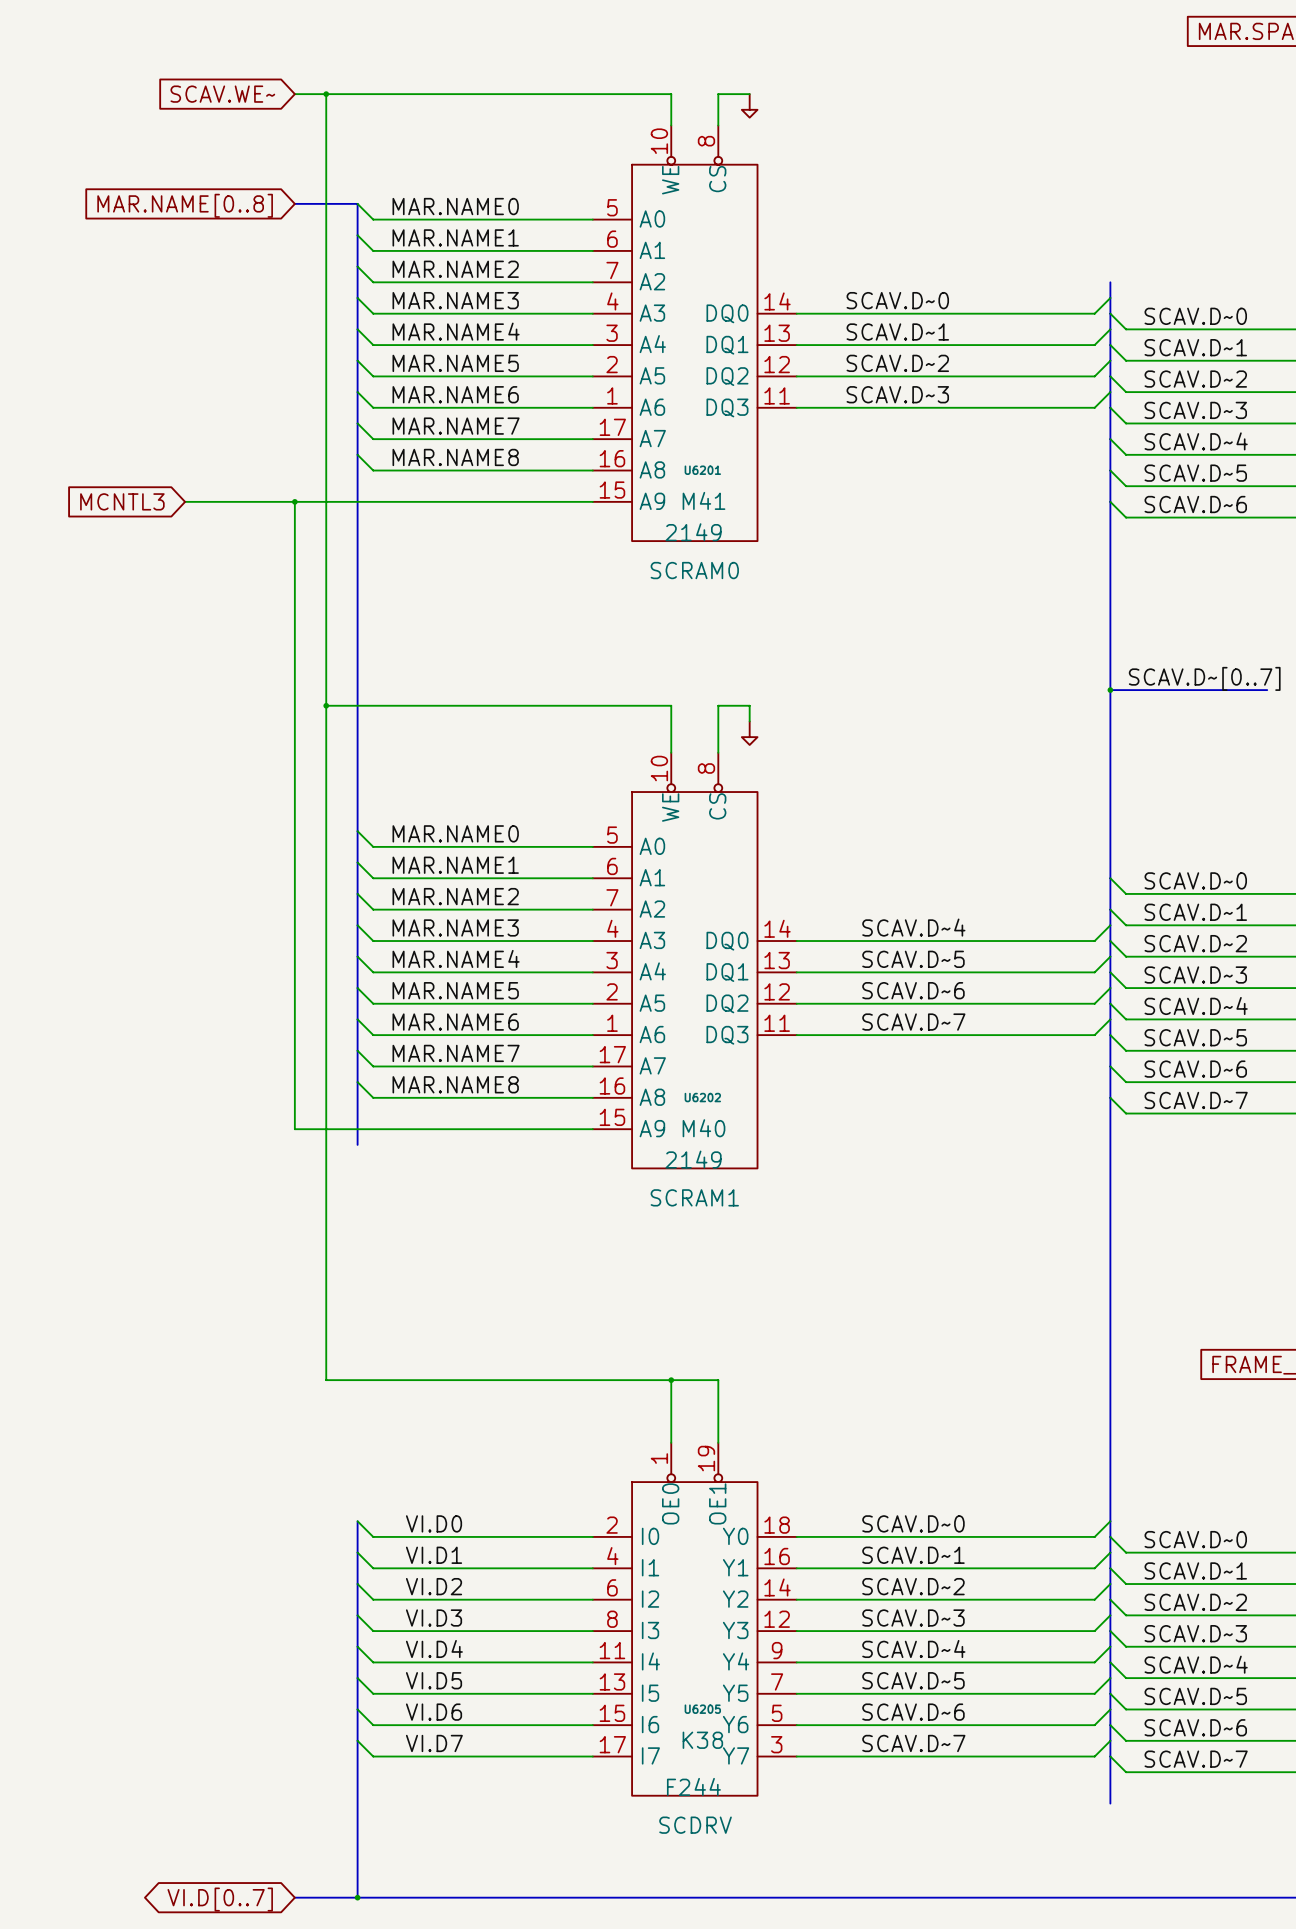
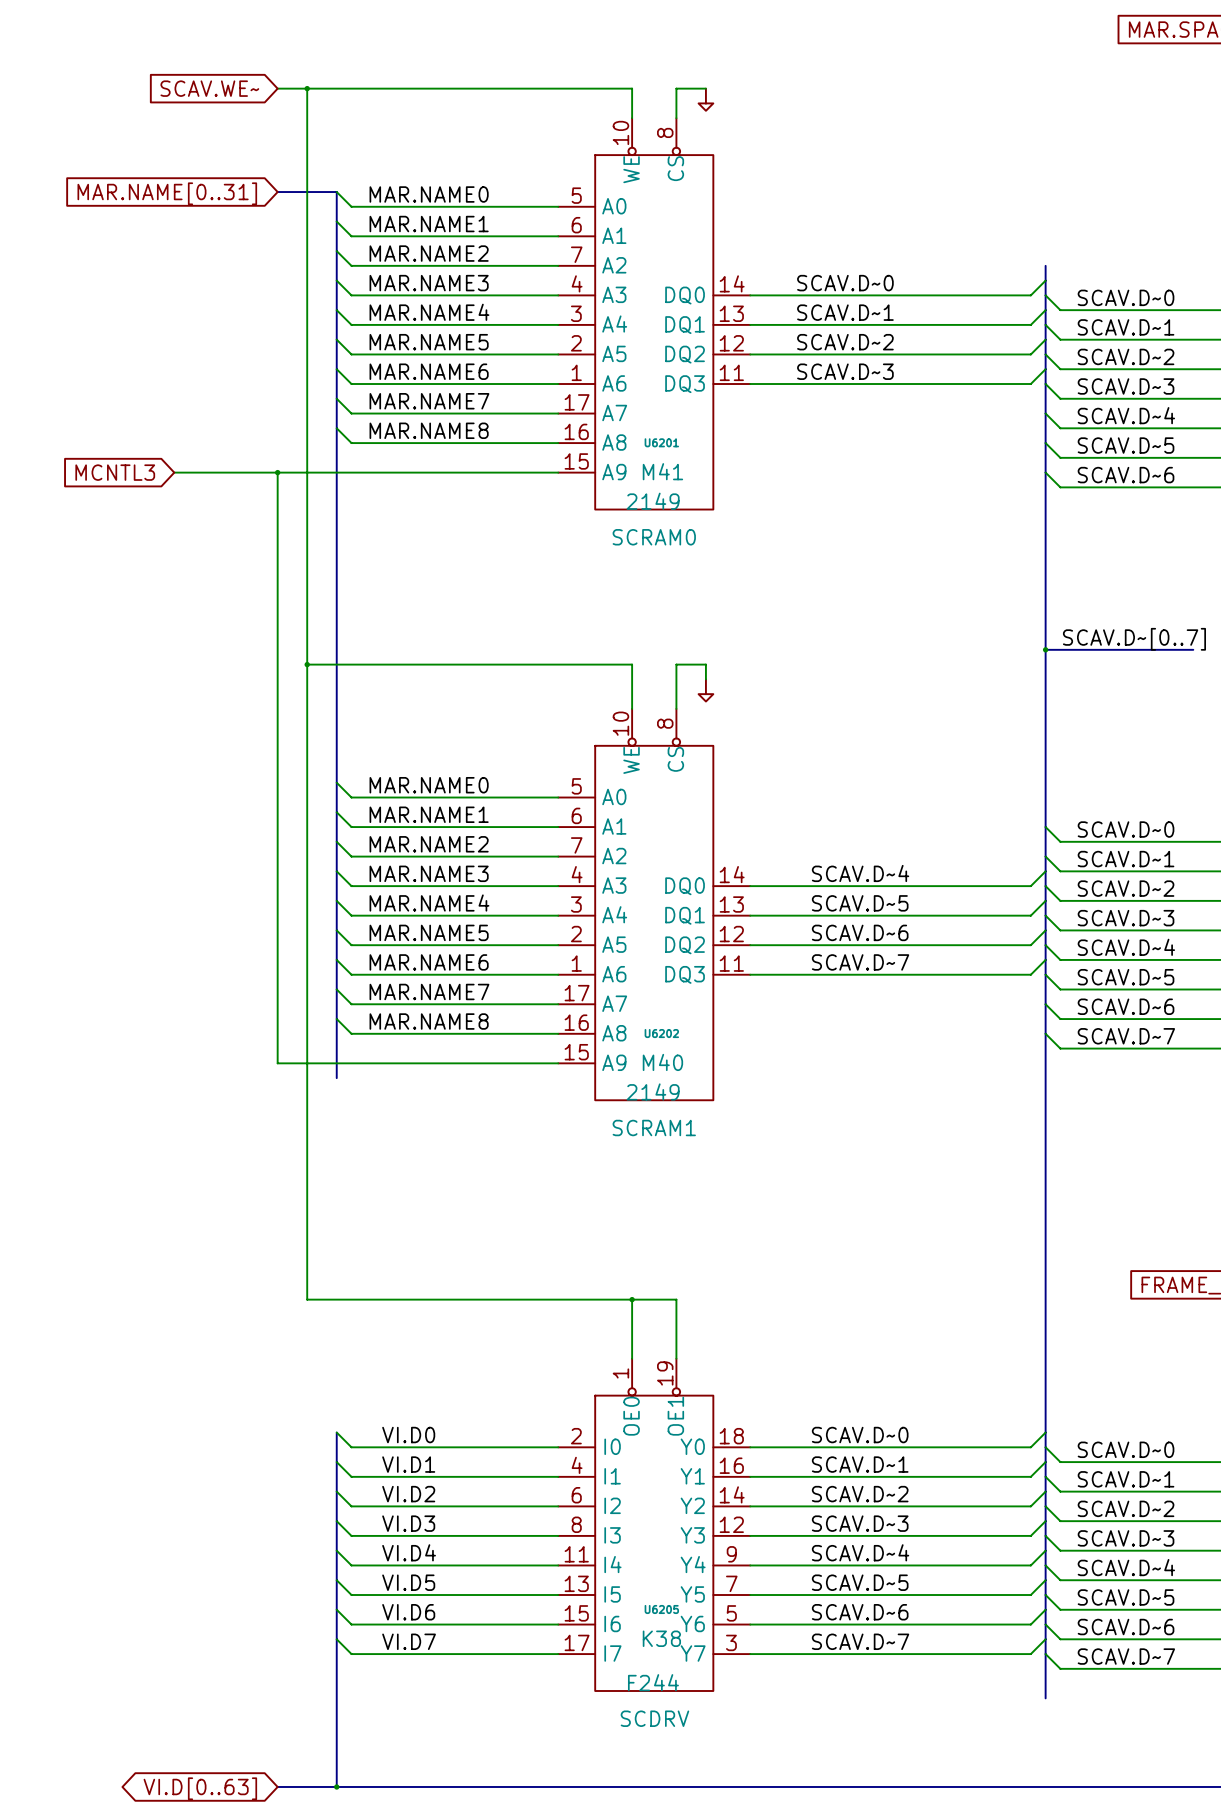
global label: MAR.NAME[0..8] (185, 205) -> MAR.NAME[0..31] (167, 193)
global label: VI.D[0..7] (220, 1899) -> VI.D[0..63] (200, 1788)

